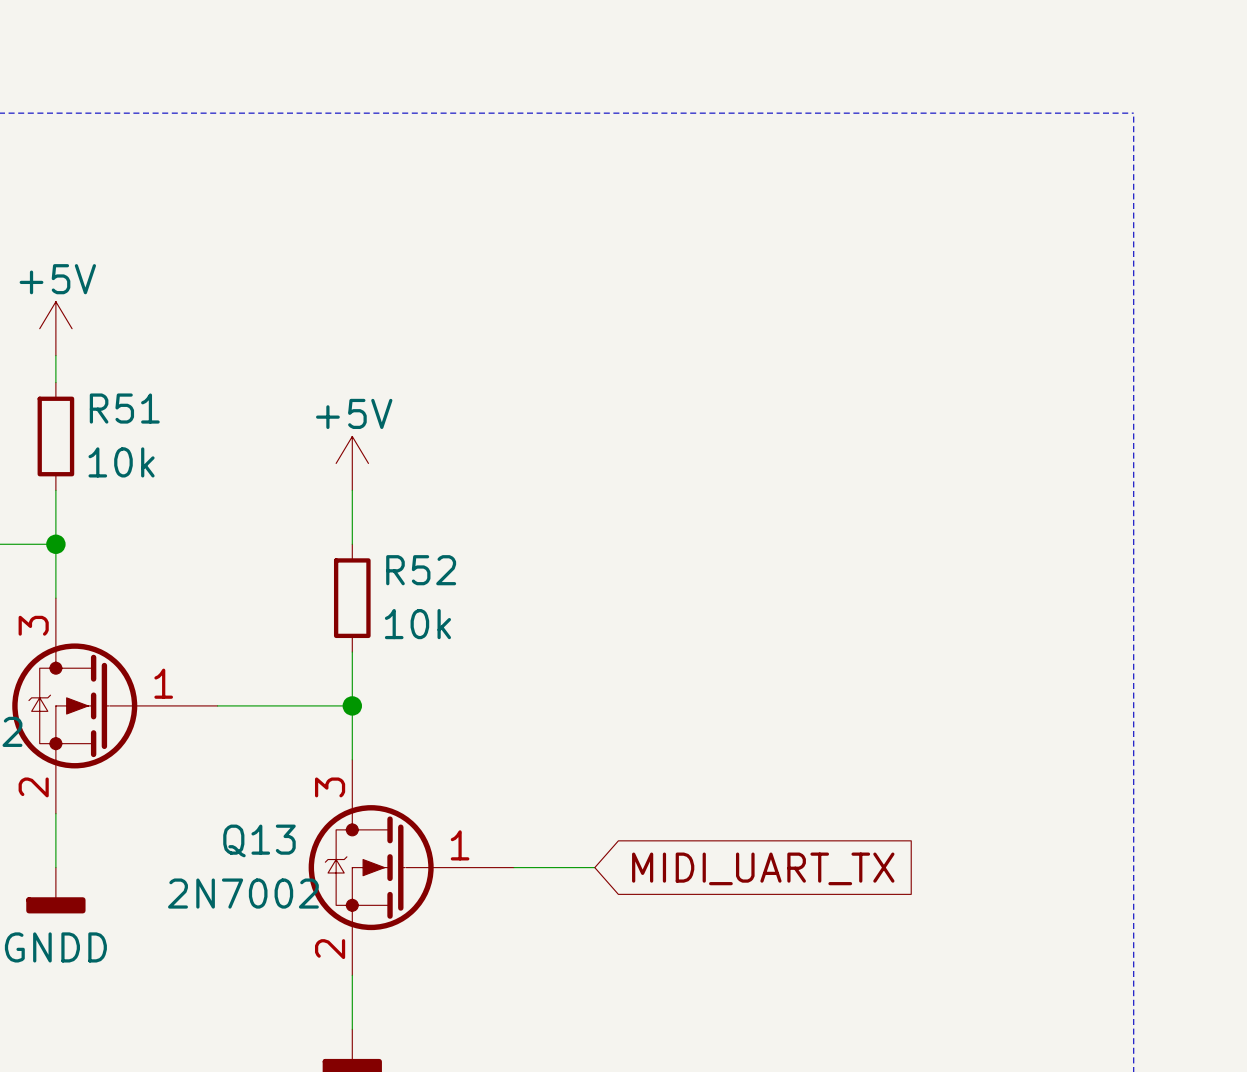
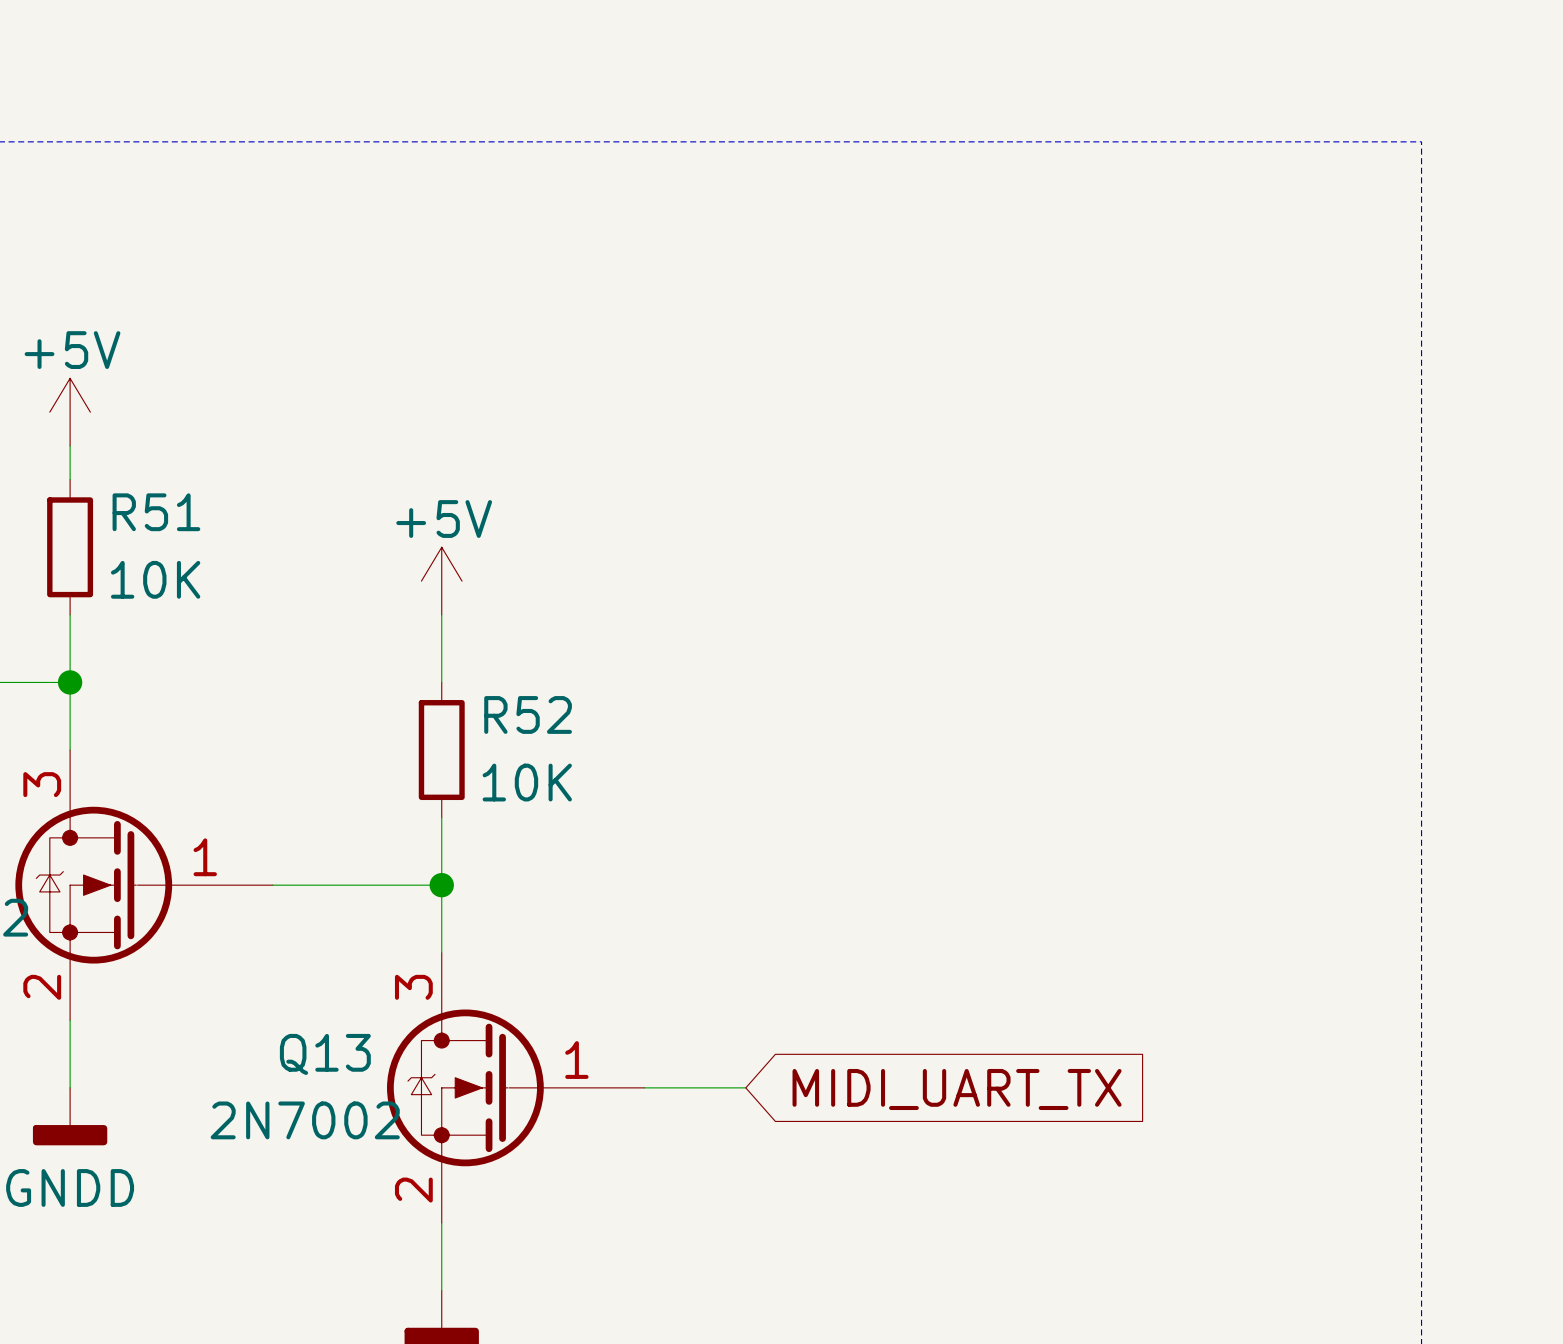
R51 value: 10k (121, 462) -> 10K (155, 579)
R52 value: 10k (417, 624) -> 10K (527, 782)

